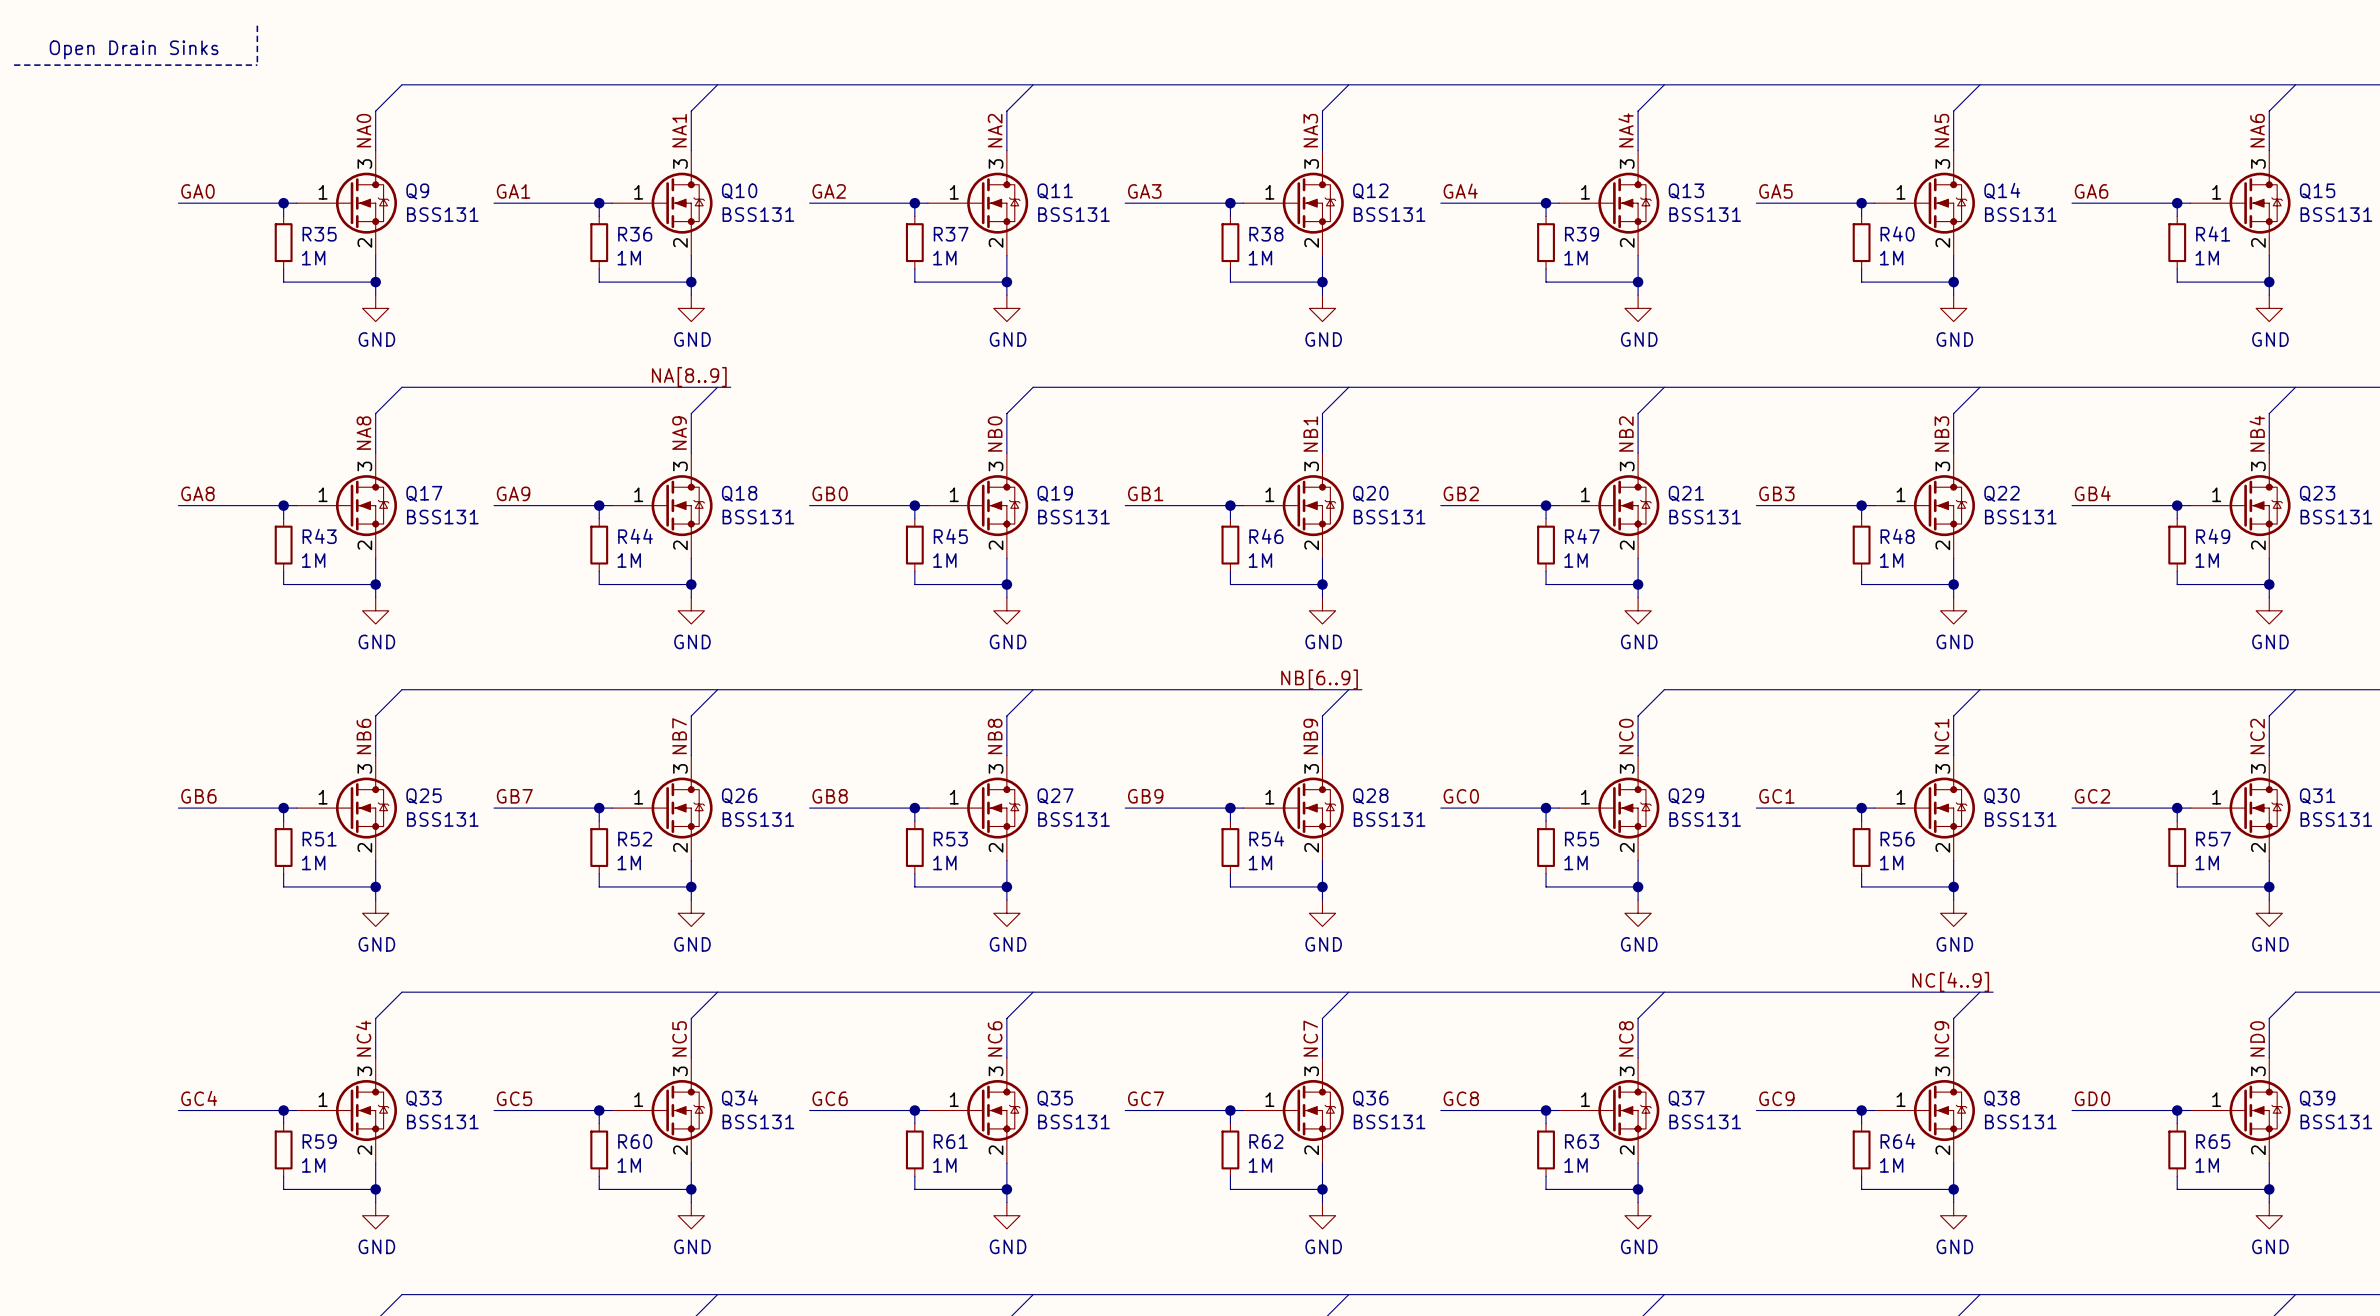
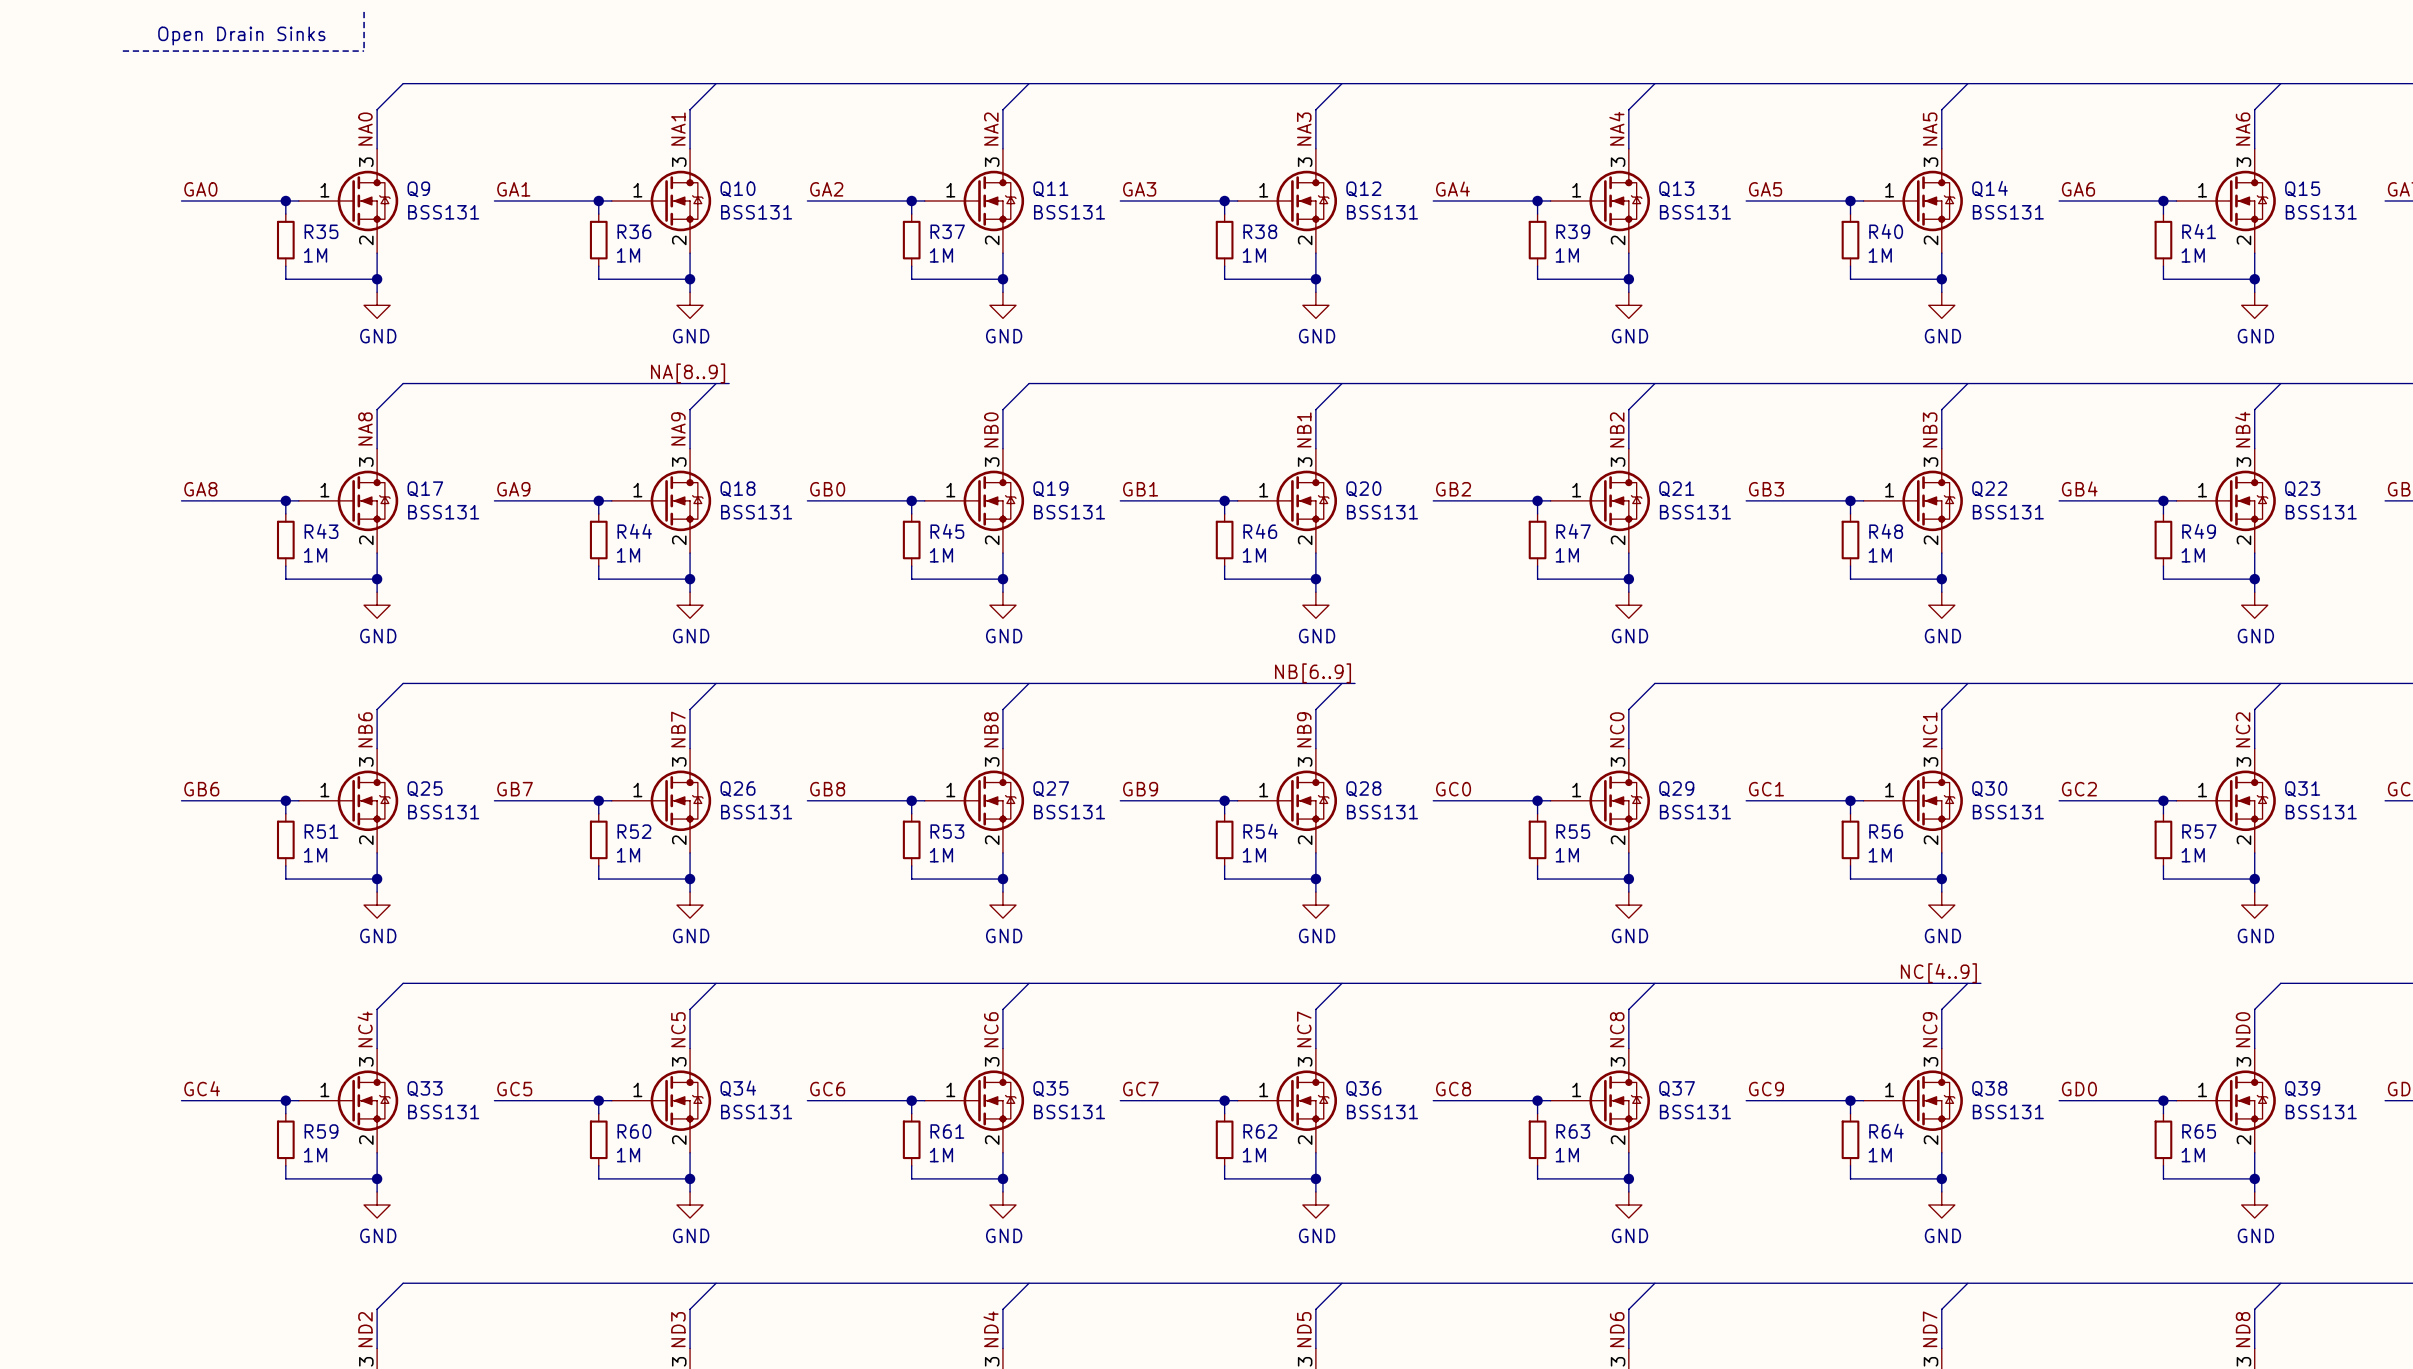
line: (257, 25) (257, 65) (14, 65) -> (364, 11) (364, 51) (122, 51)
text position: Open Drain Sinks (134, 49) -> Open Drain Sinks (241, 36)

